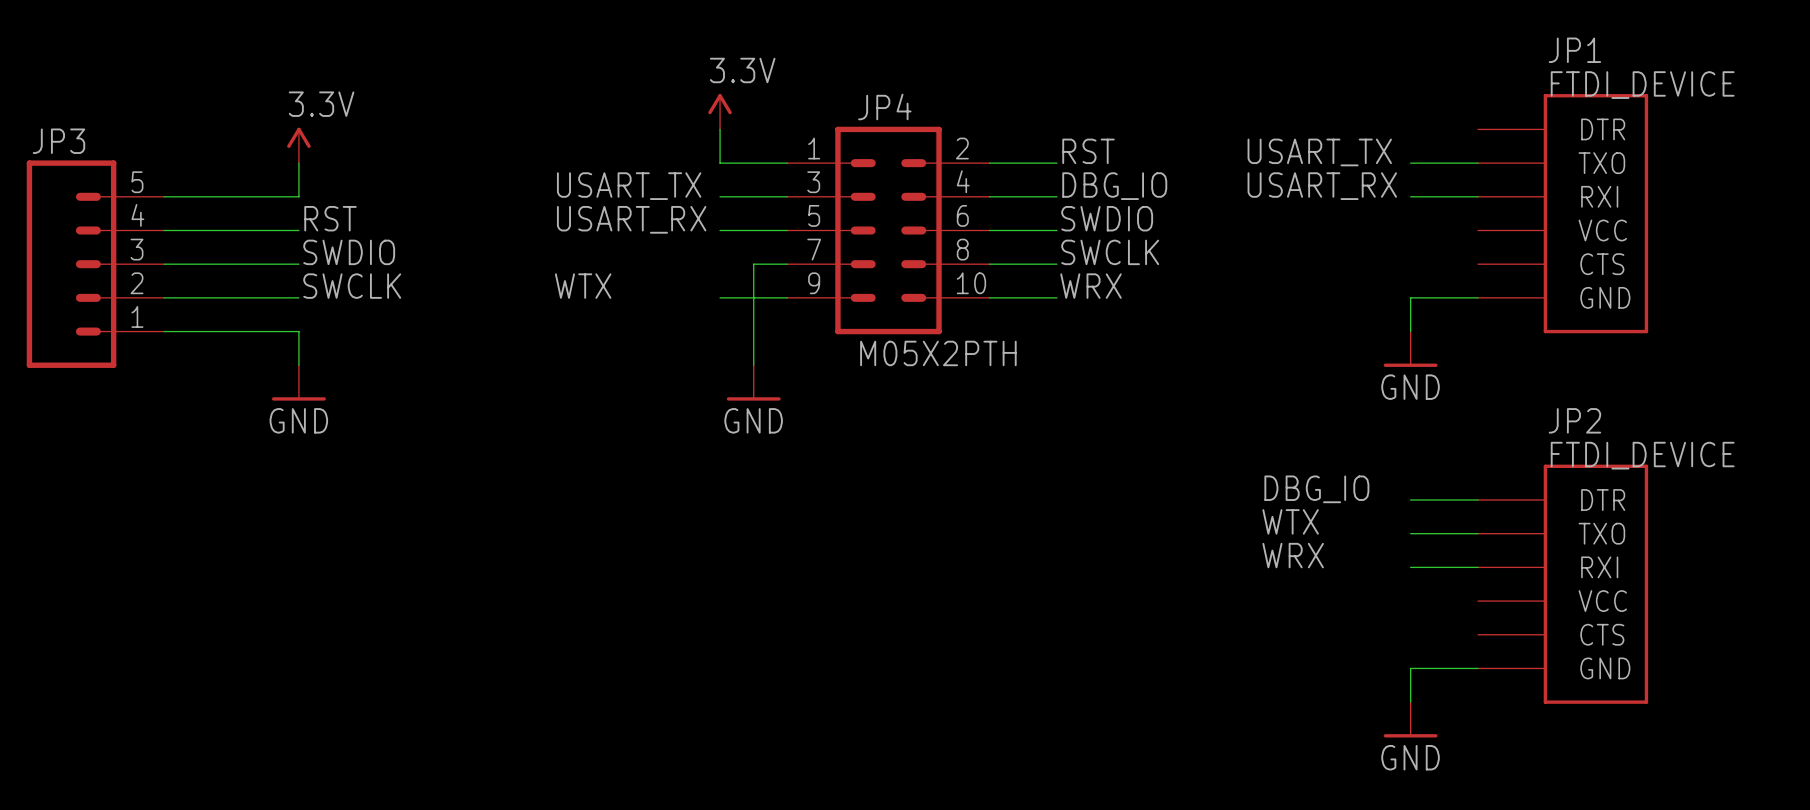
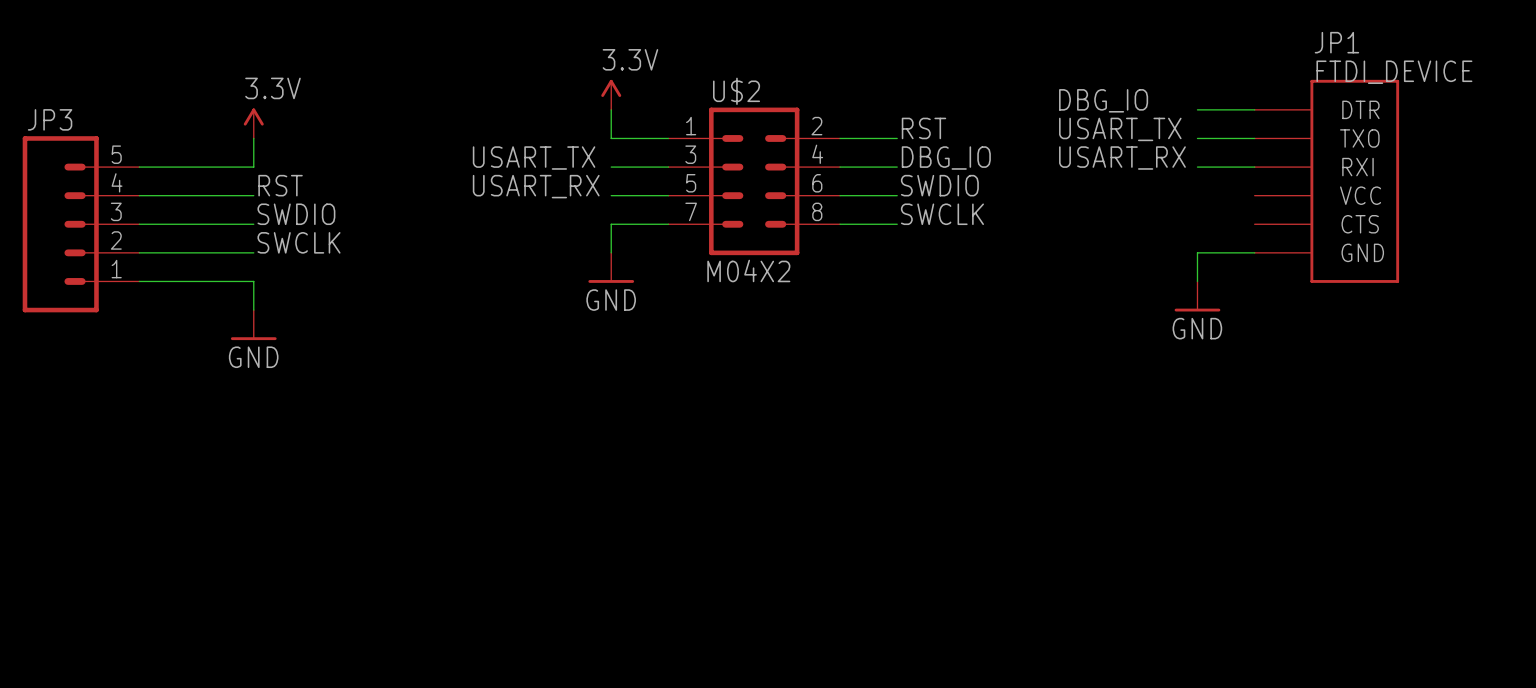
label: none -> DBG_IO (1103, 100)
wire: none -> (1197, 109) (1254, 109)
U$2: none -> M04X2 (754, 181)
JP4: M05X2PTH (888, 230) -> none
wire: (753, 264) (753, 365) -> none
label: WTX (583, 286) -> none
label: WRX (1091, 286) -> none
wire: (720, 297) (787, 297) -> (611, 252) (611, 224) (639, 224)
wire: (989, 297) (1056, 297) -> none
power symbol position: GND (753, 382) -> GND (611, 267)
label: DBG_IO (1316, 489) -> none
wire: (1410, 500) (1478, 500) -> none
label: WTX (1290, 521) -> none
wire: (1410, 533) (1478, 533) -> none
label: WRX (1293, 555) -> none
wire: (1410, 567) (1478, 567) -> none
JP2: FTDI_DEVICE (1563, 584) -> none
wire: (1478, 668) (1410, 668) (1410, 702) -> none
power symbol: GND (1410, 719) -> none

